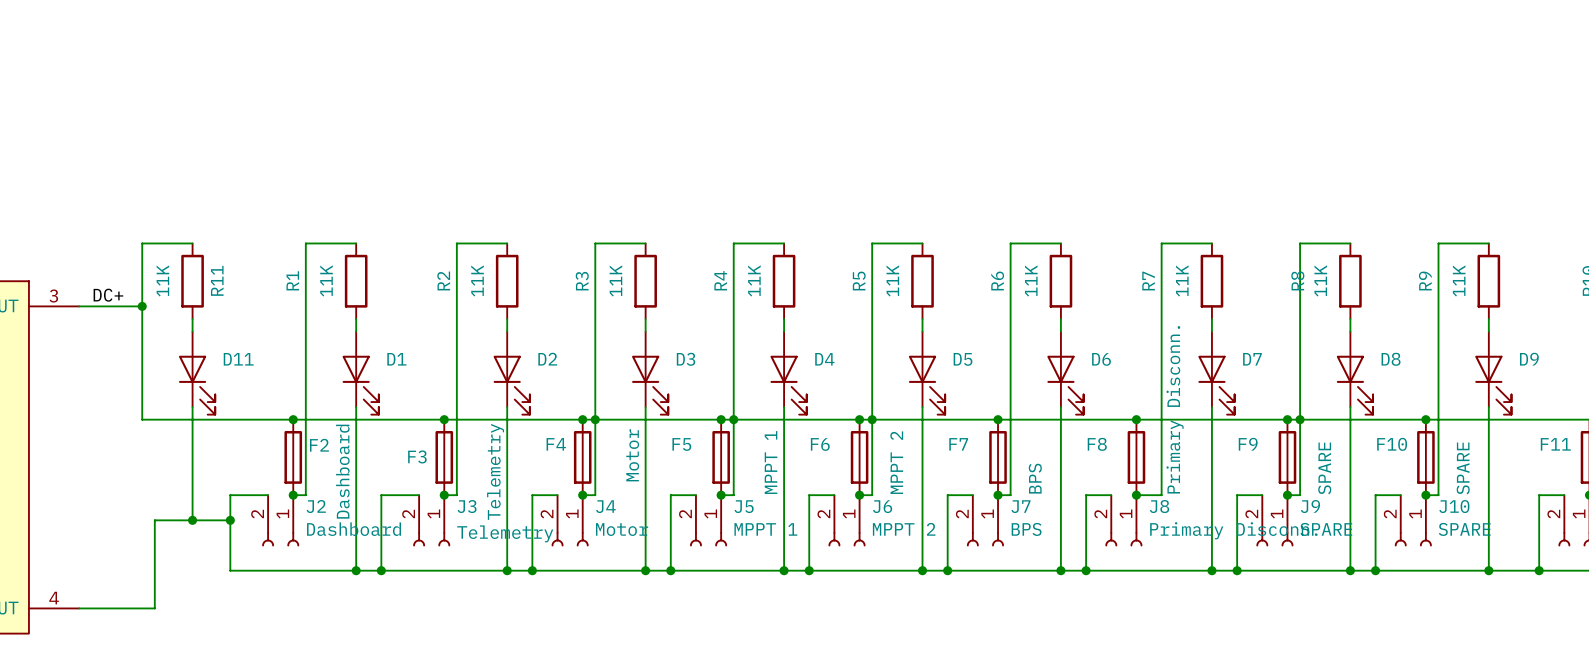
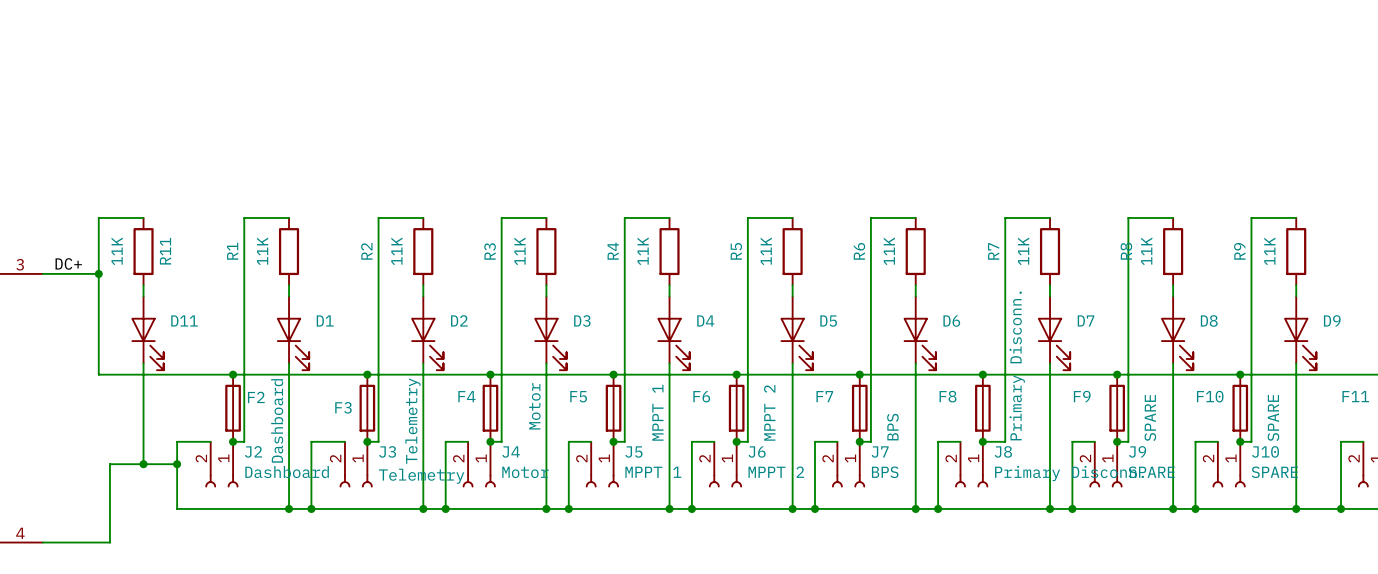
junction: (595, 419) -> none
junction: (733, 419) -> none
junction: (872, 419) -> none
junction: (1300, 419) -> none

